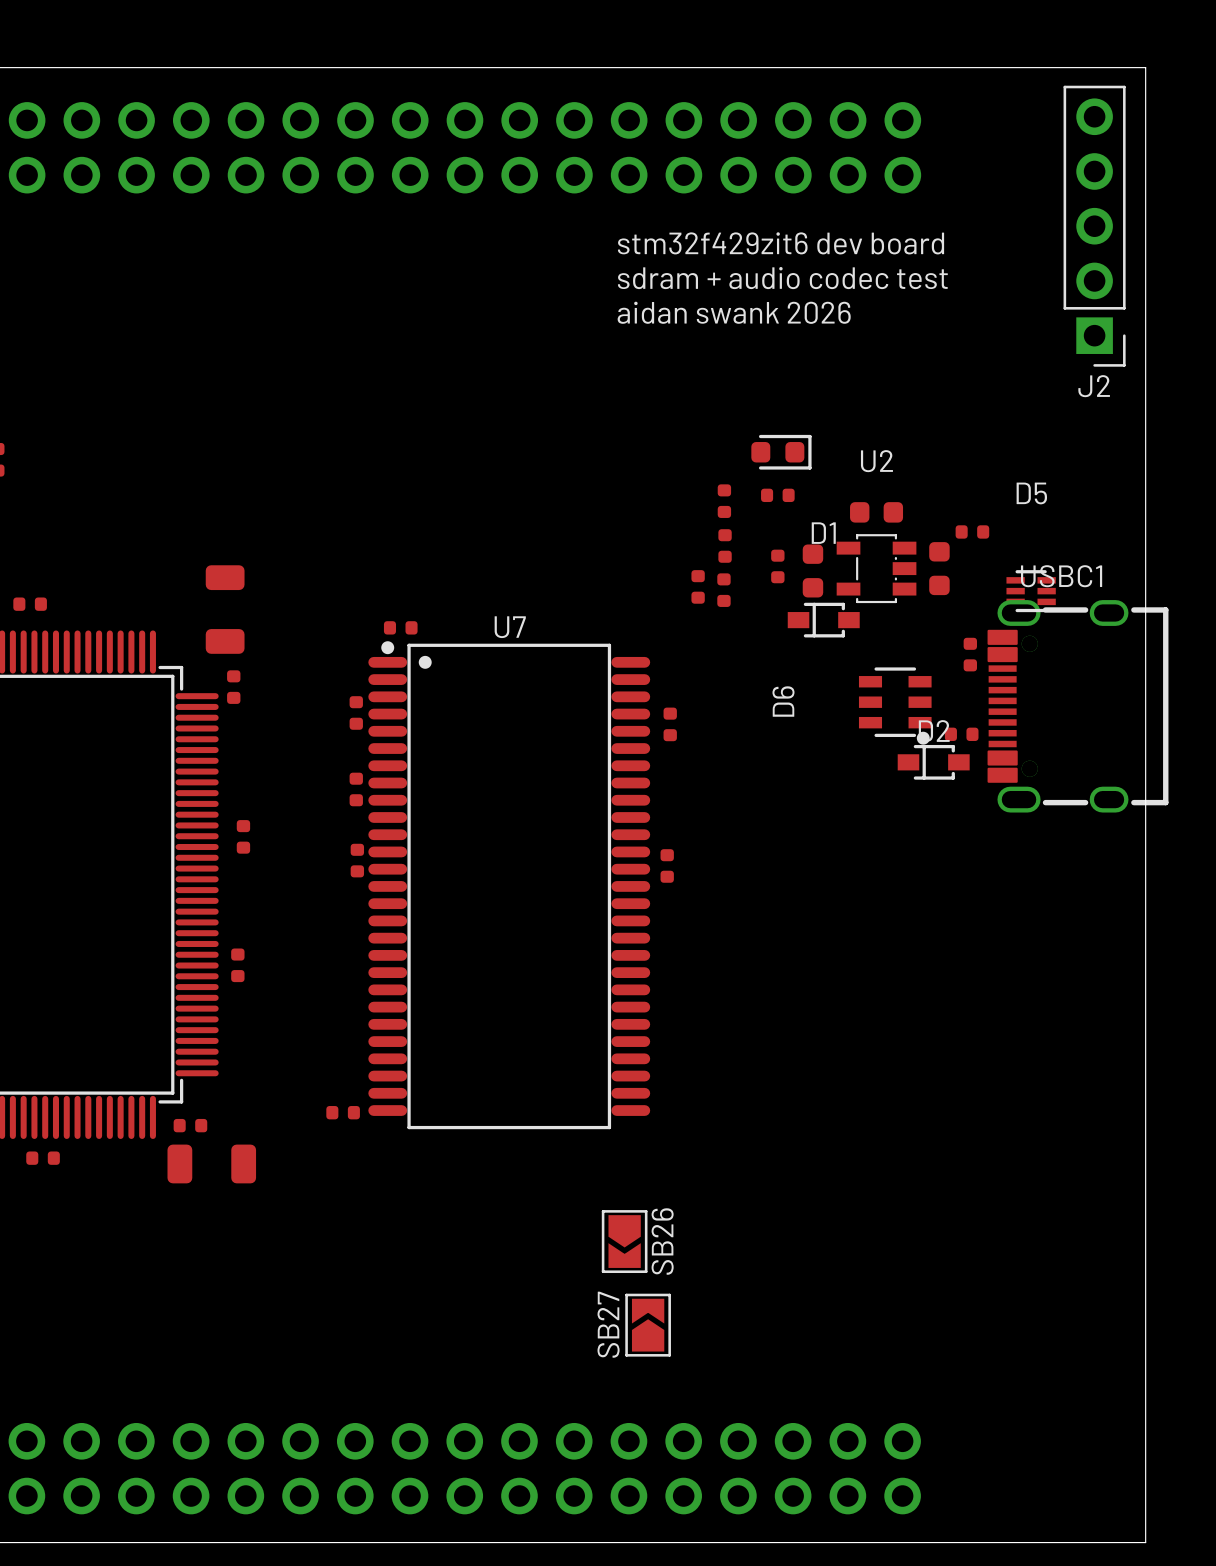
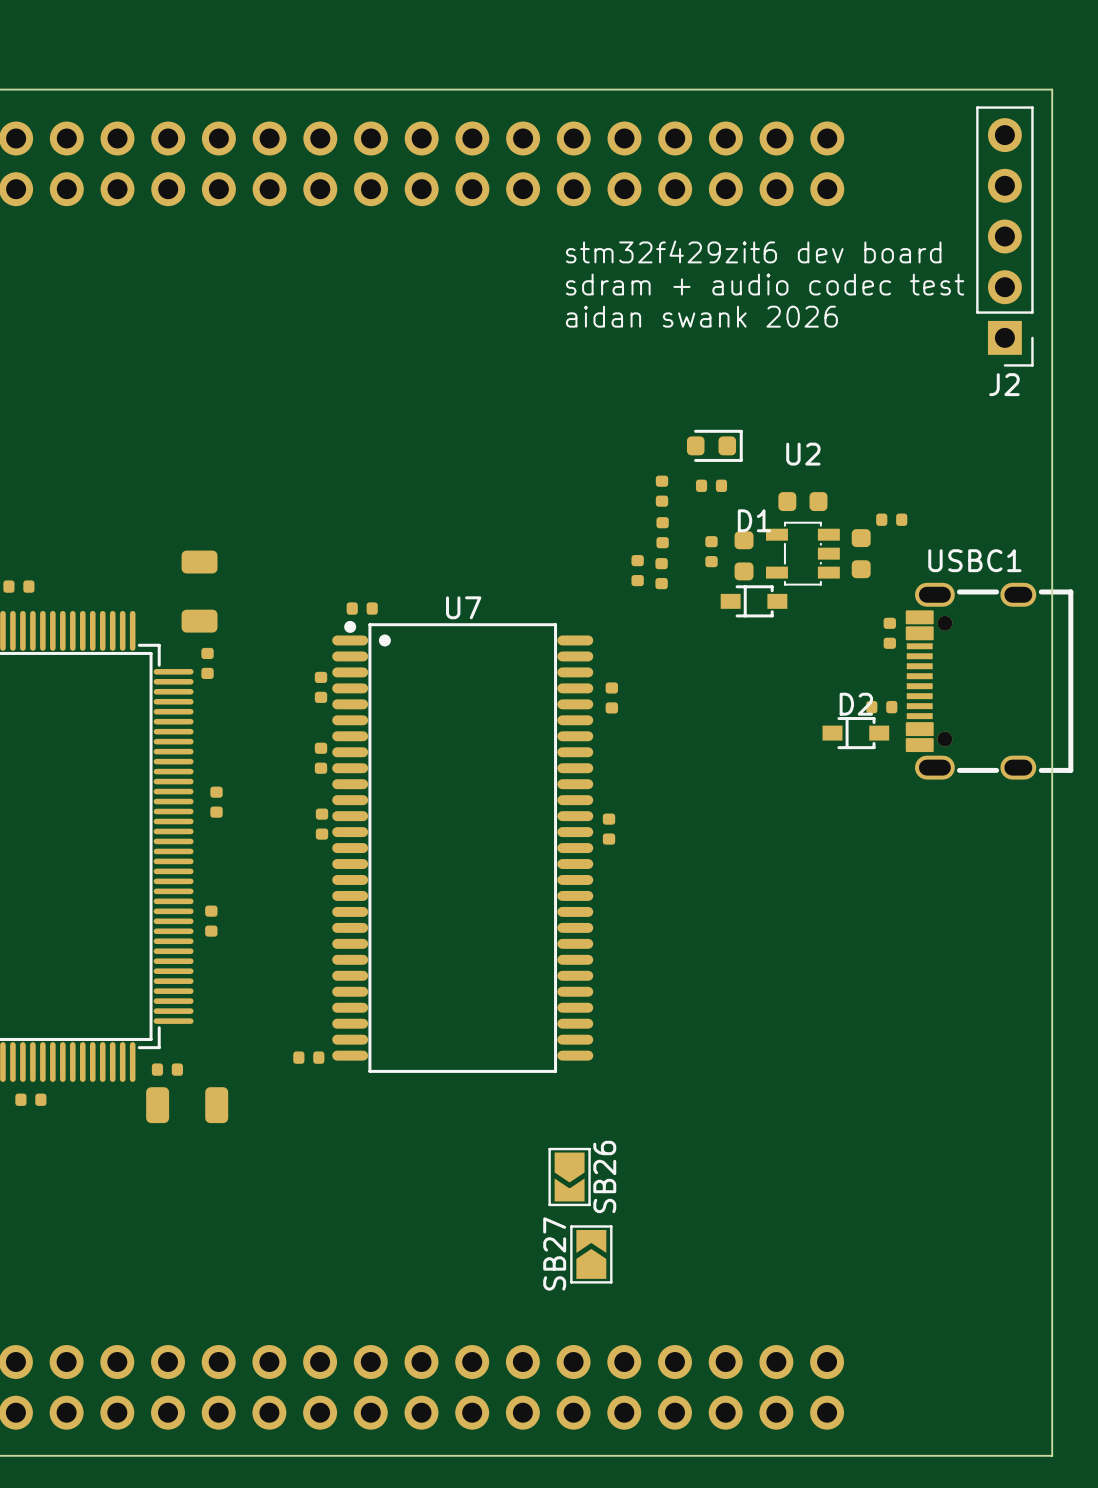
D5: (1031, 592) -> none
D6: (895, 706) -> none

